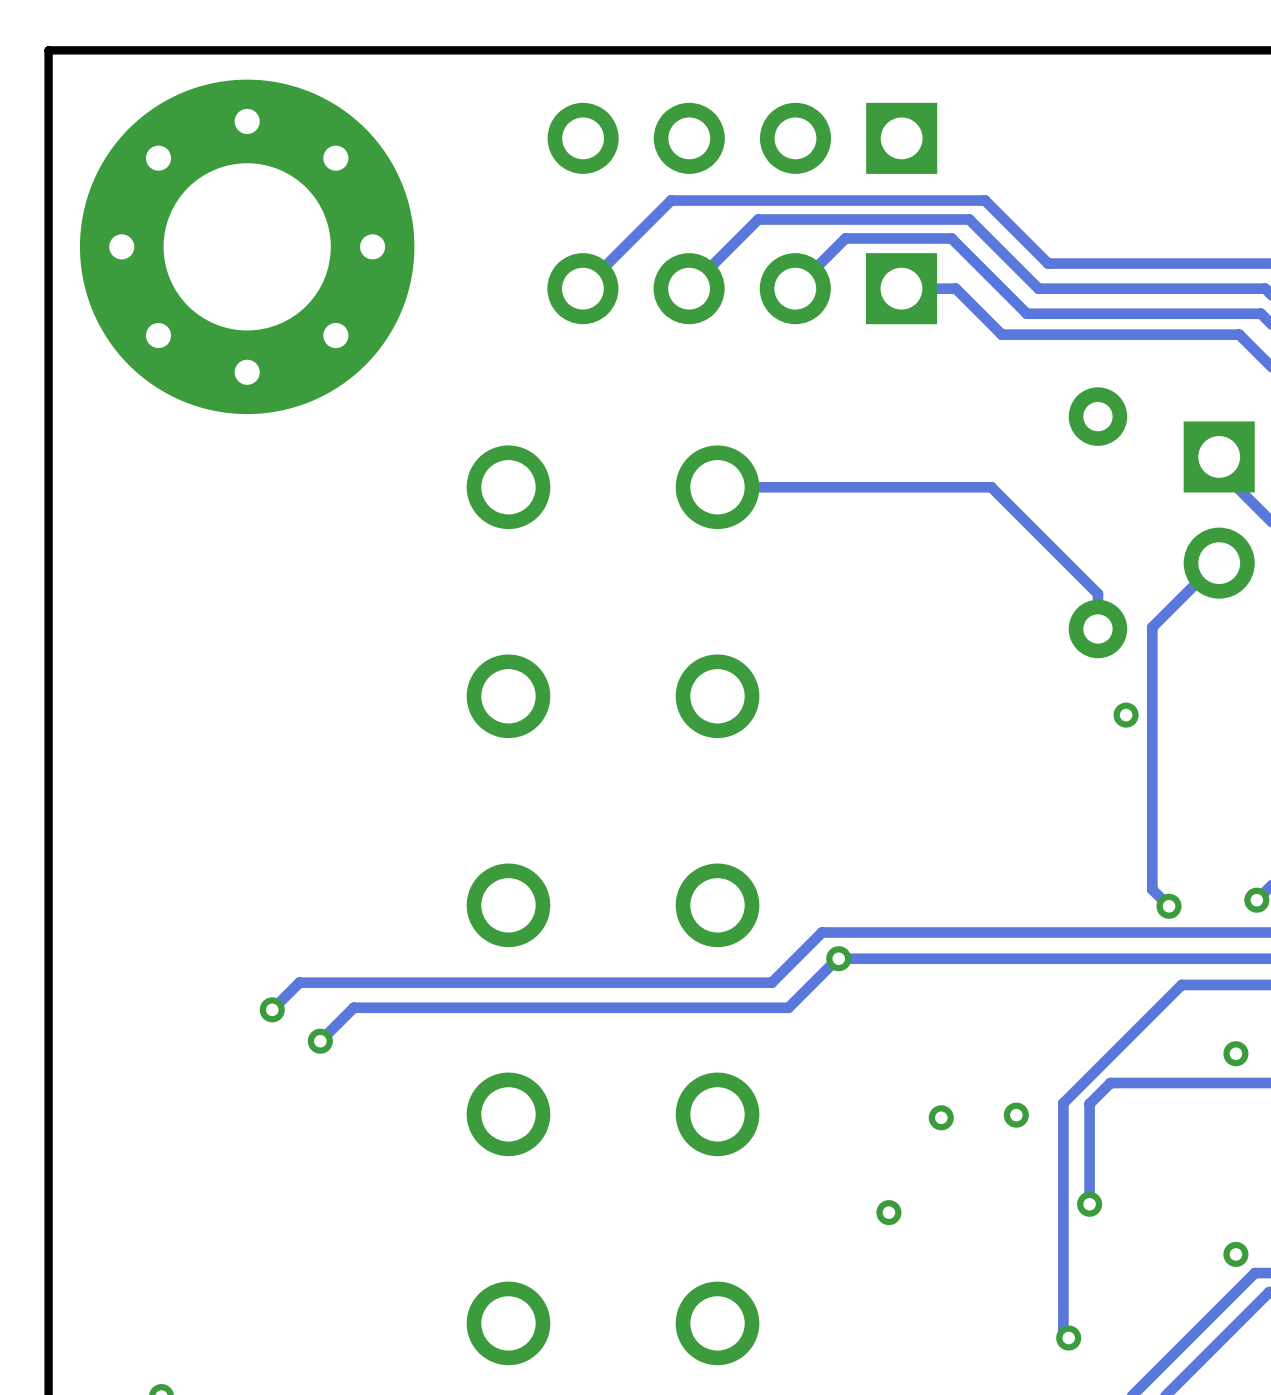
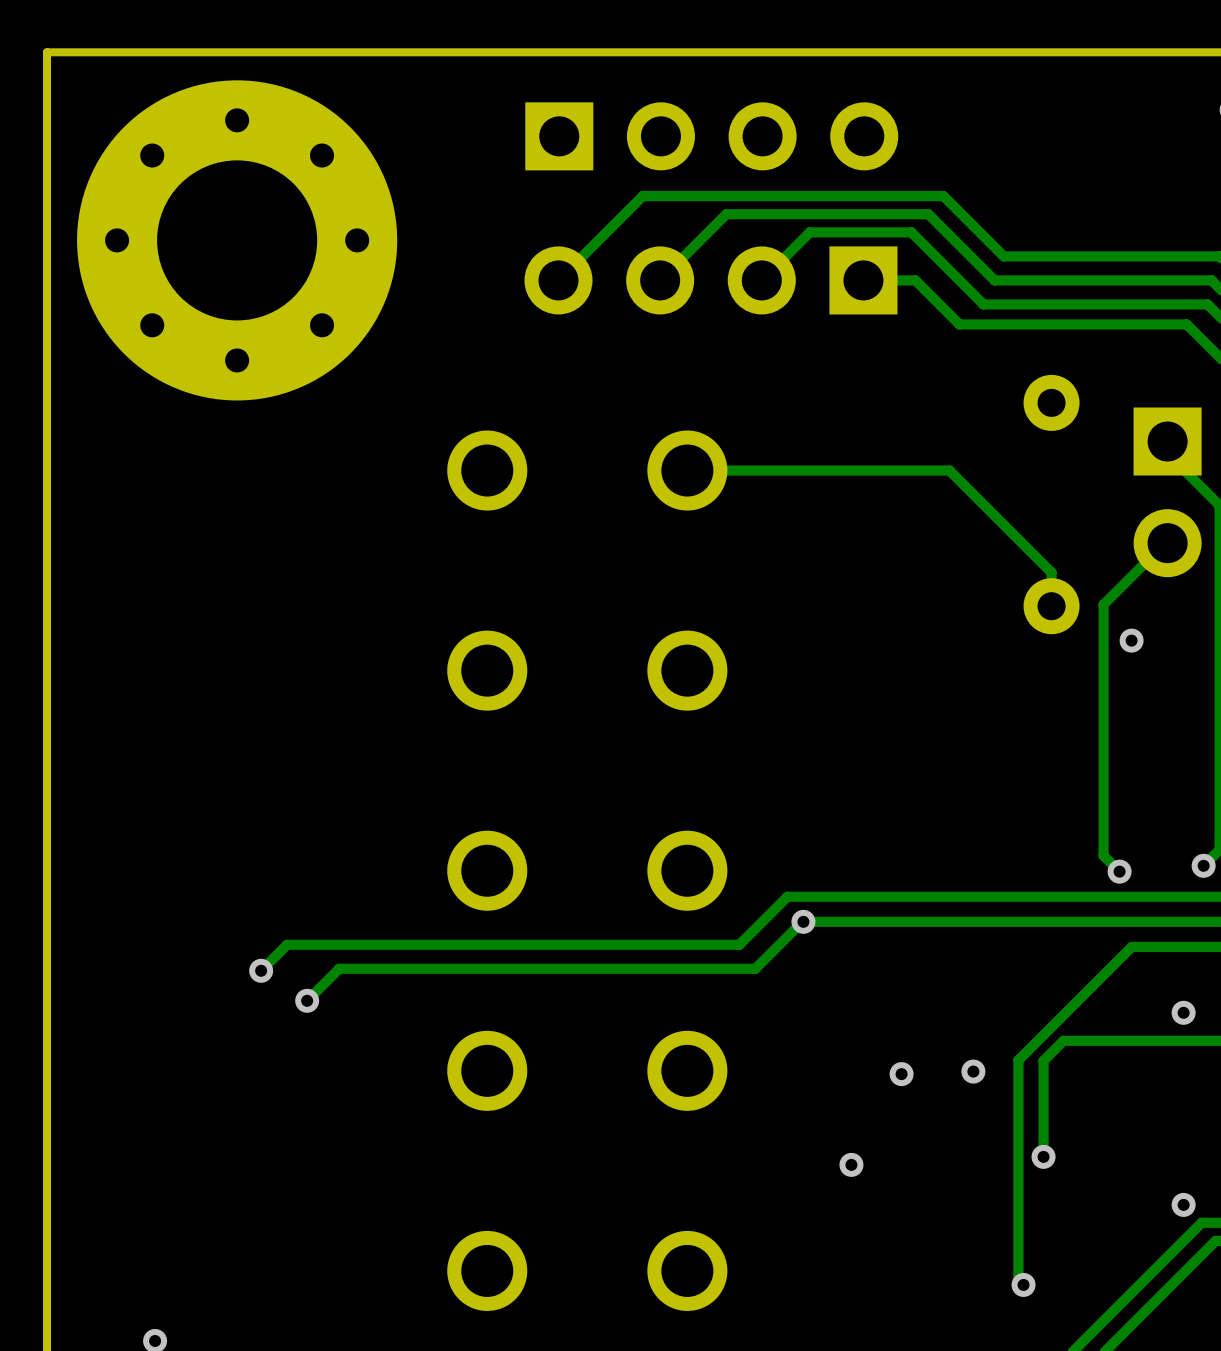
part rotation: 0° (742, 138) -> 180° (711, 136)
via position: (1126, 715) -> (1131, 640)

